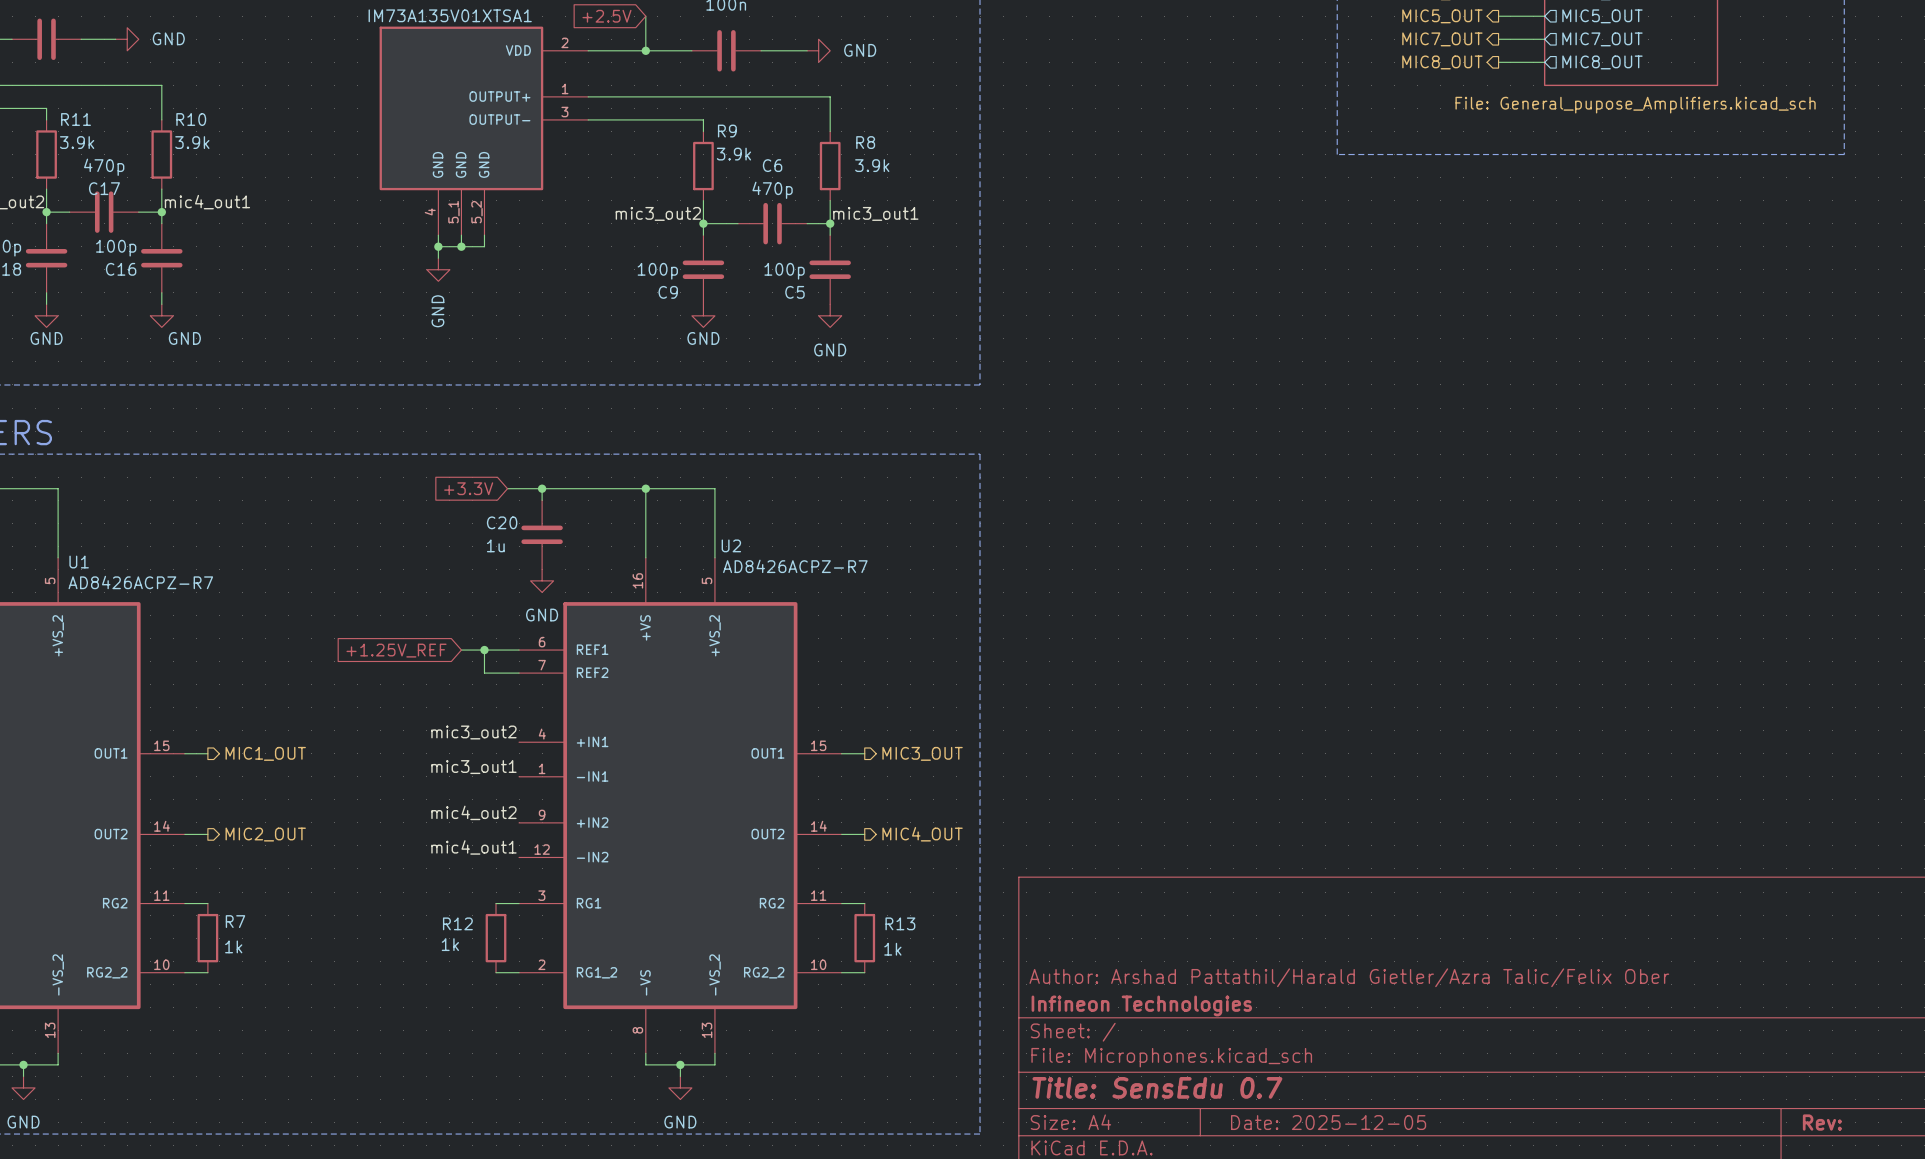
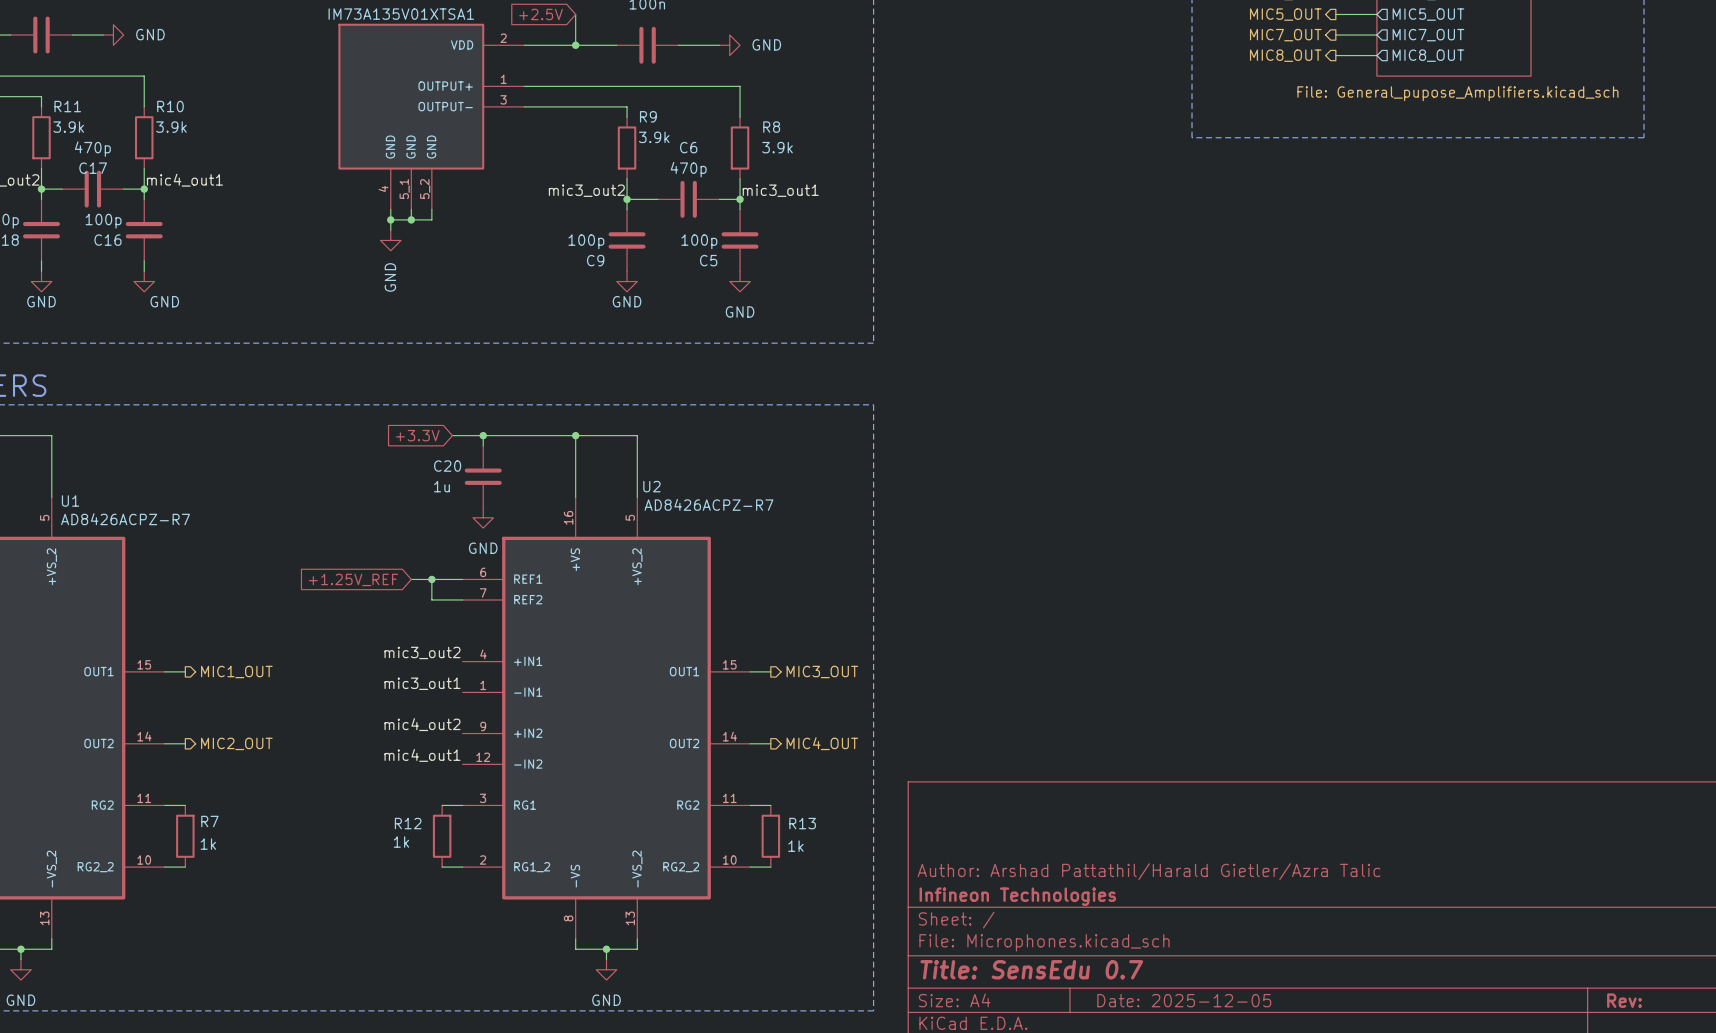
title block: Author: Arshad Pattathil/Harald Gietler/Azra Talic/Felix Ober (1349, 977) -> Author: Arshad Pattathil/Harald Gietler/Azra Talic (1149, 871)

